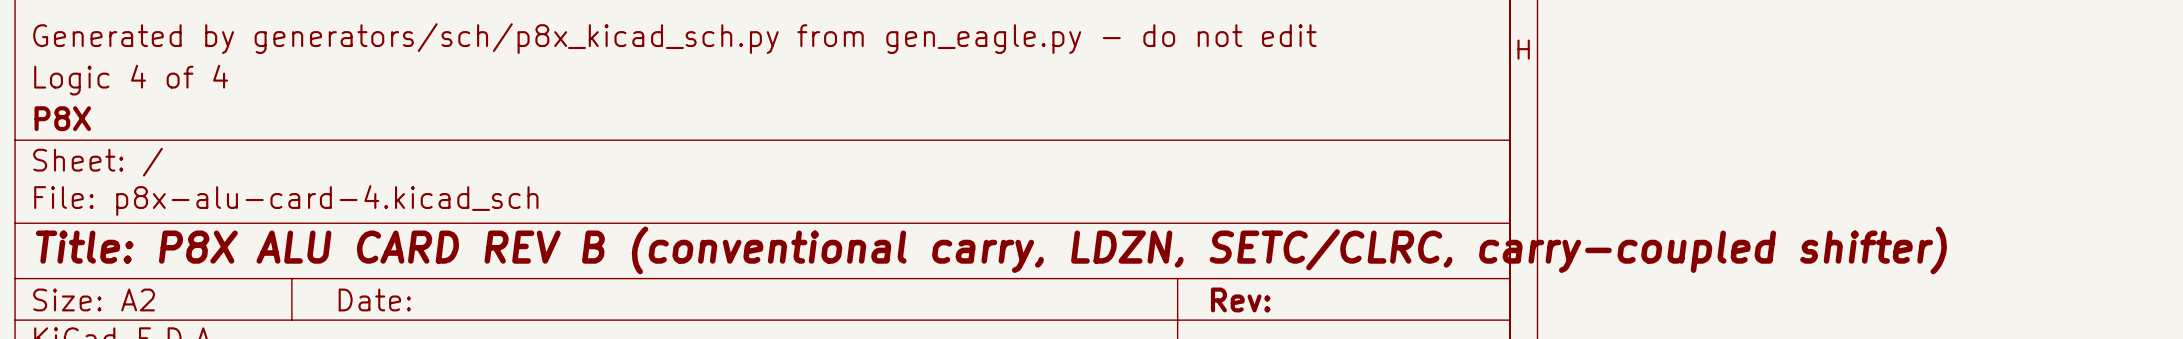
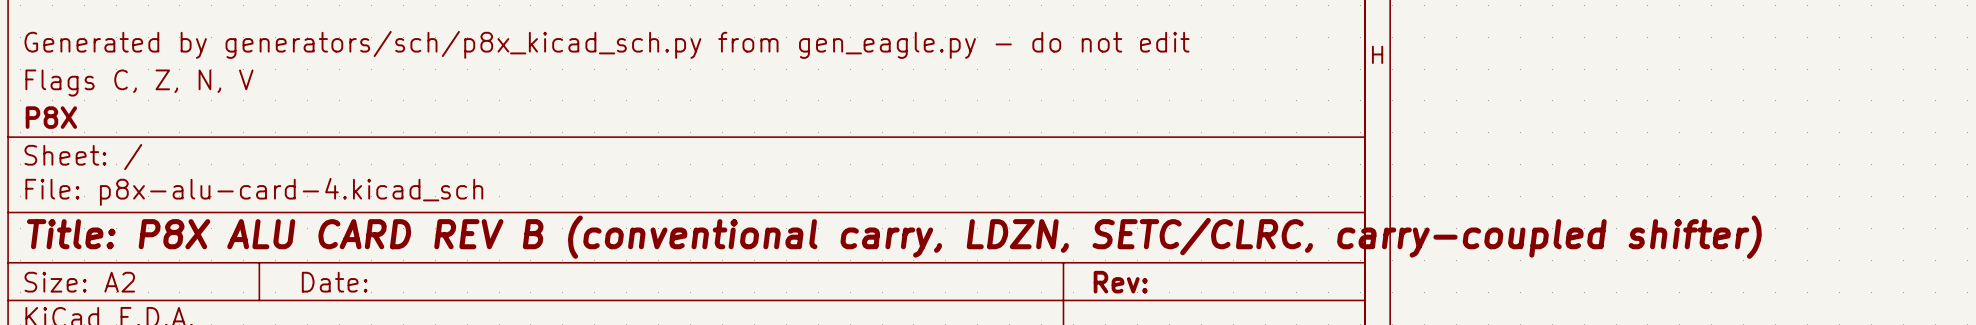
title block: Logic 4 of 4 (131, 80) -> Flags C, Z, N, V (139, 83)

